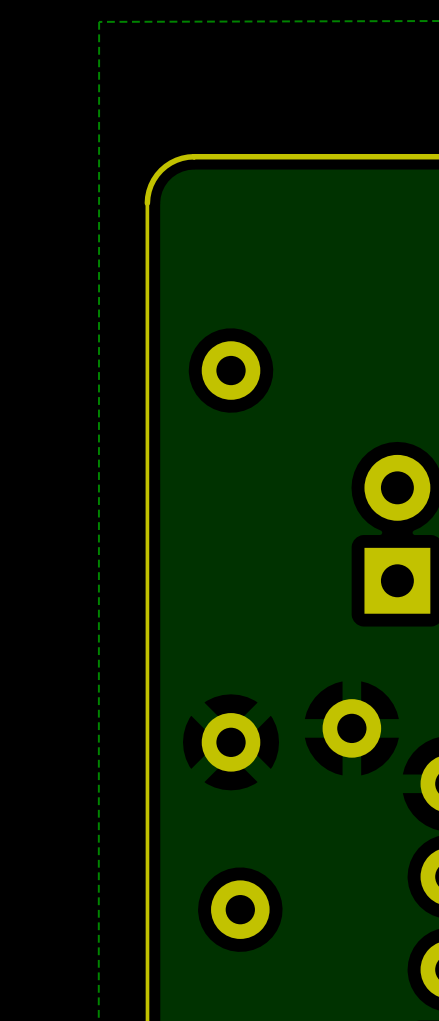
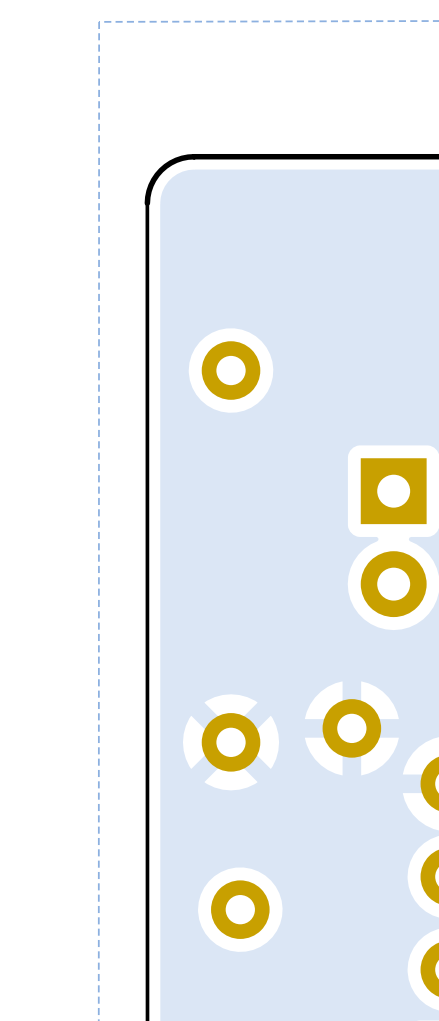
part rotation: 0° (397, 534) -> 180° (393, 537)

